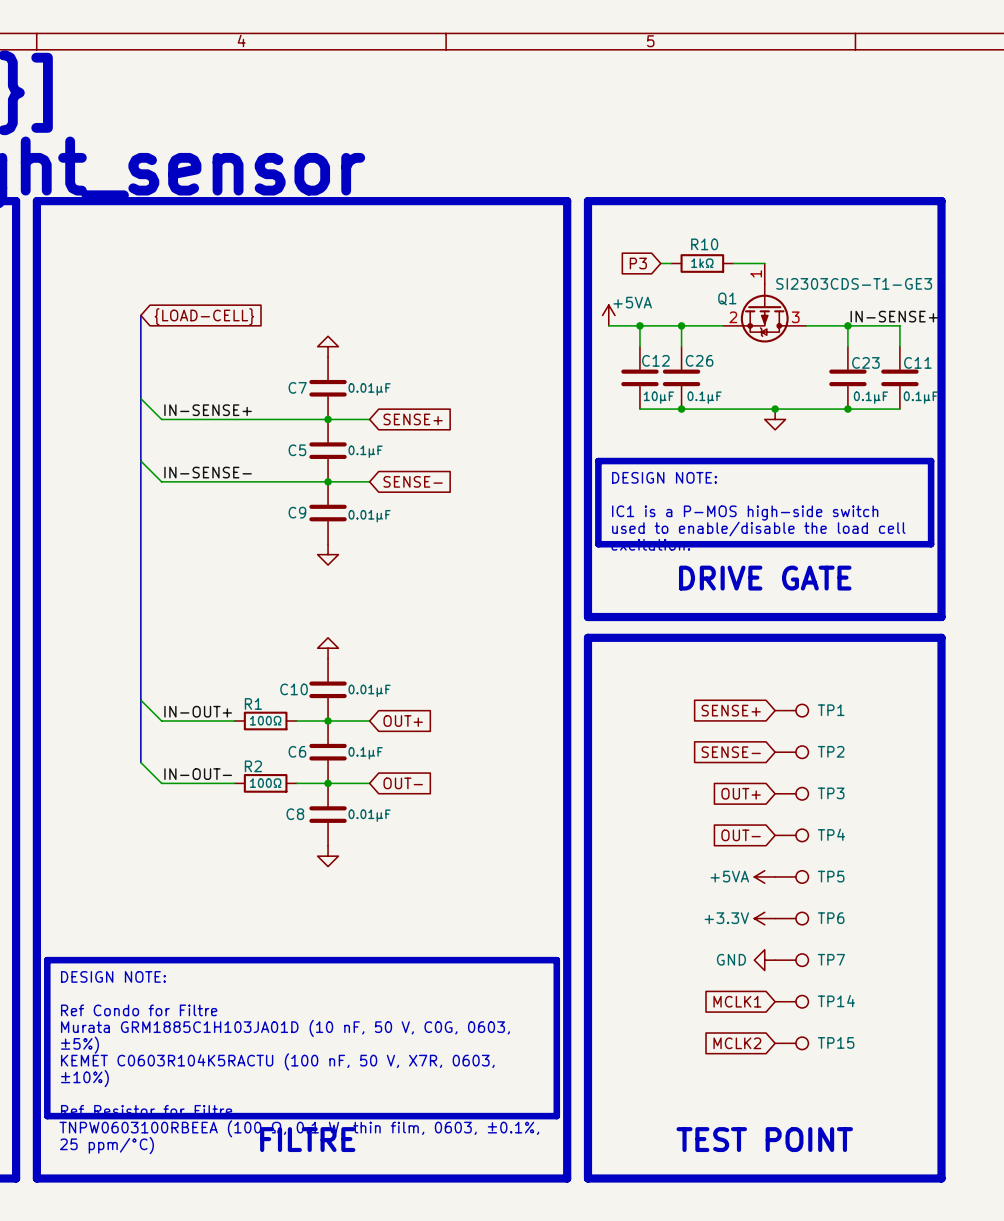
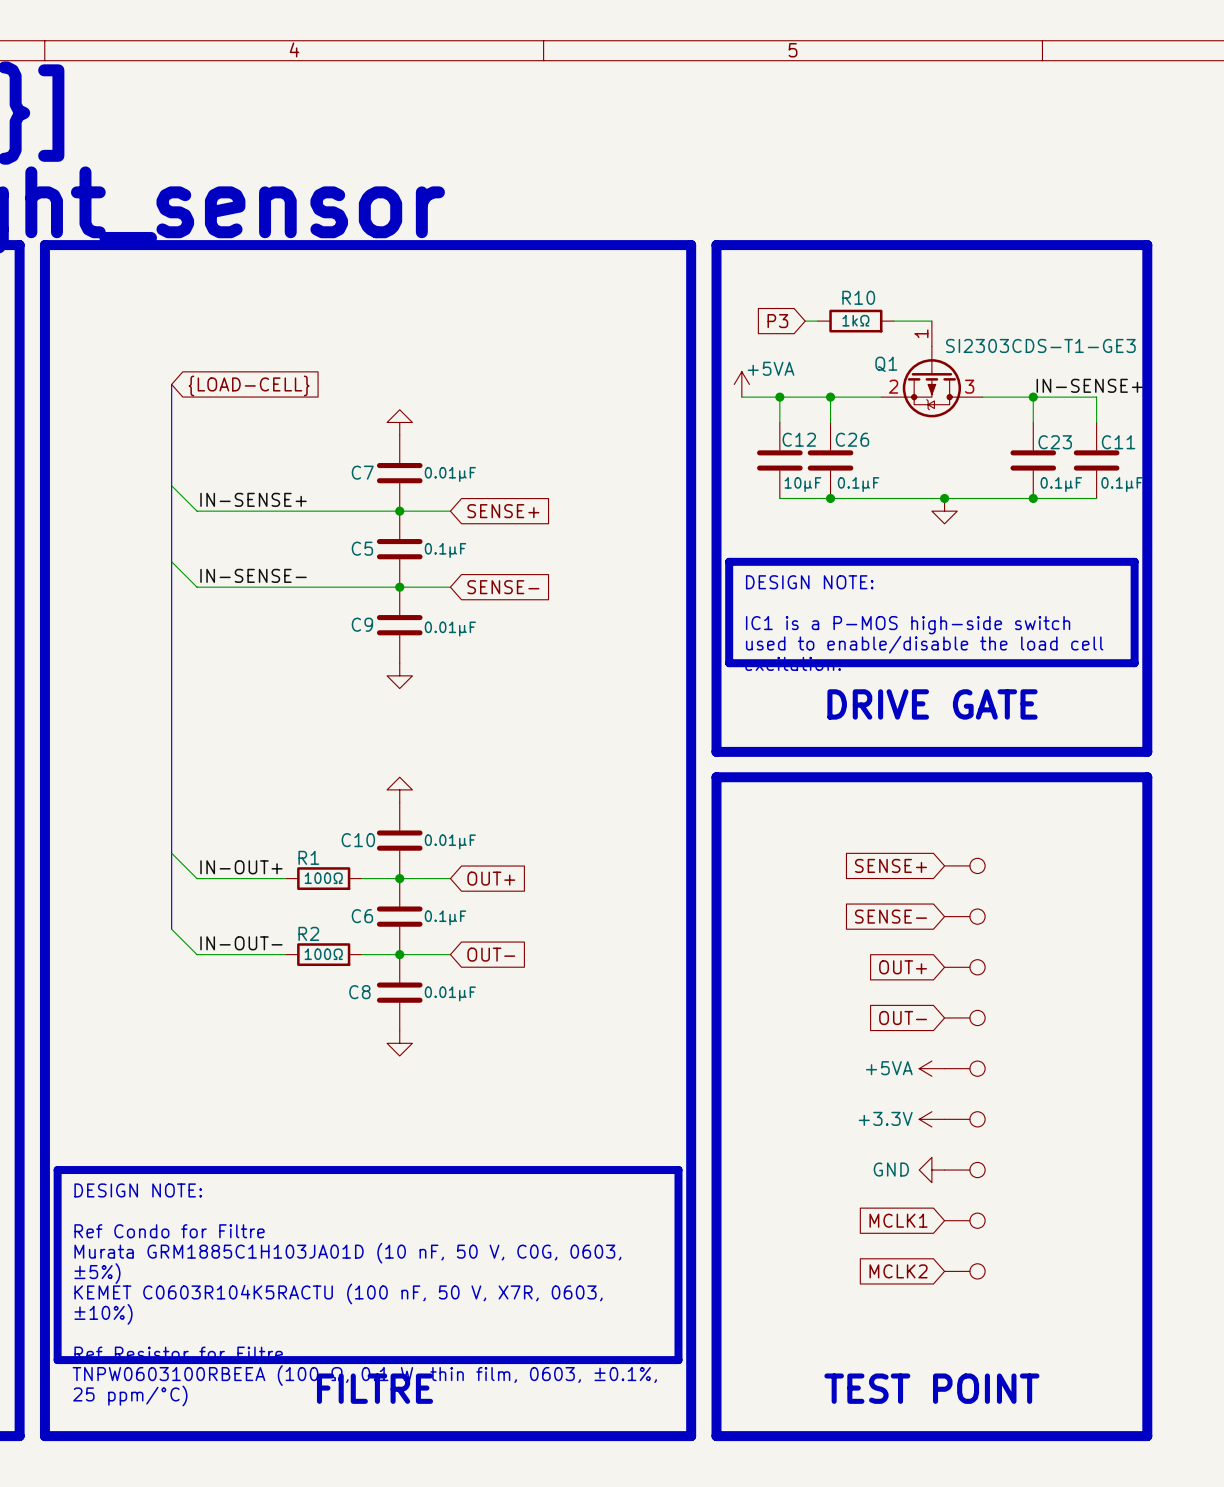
TP1 name: TP1 (831, 710) -> none
TP2 name: TP2 (831, 751) -> none
TP3 name: TP3 (831, 793) -> none
TP4 name: TP4 (831, 834) -> none
TP5 name: TP5 (831, 876) -> none
TP6 name: TP6 (831, 918) -> none
TP7 name: TP7 (831, 959) -> none
TP14 name: TP14 (836, 1001) -> none
TP15 name: TP15 (836, 1042) -> none

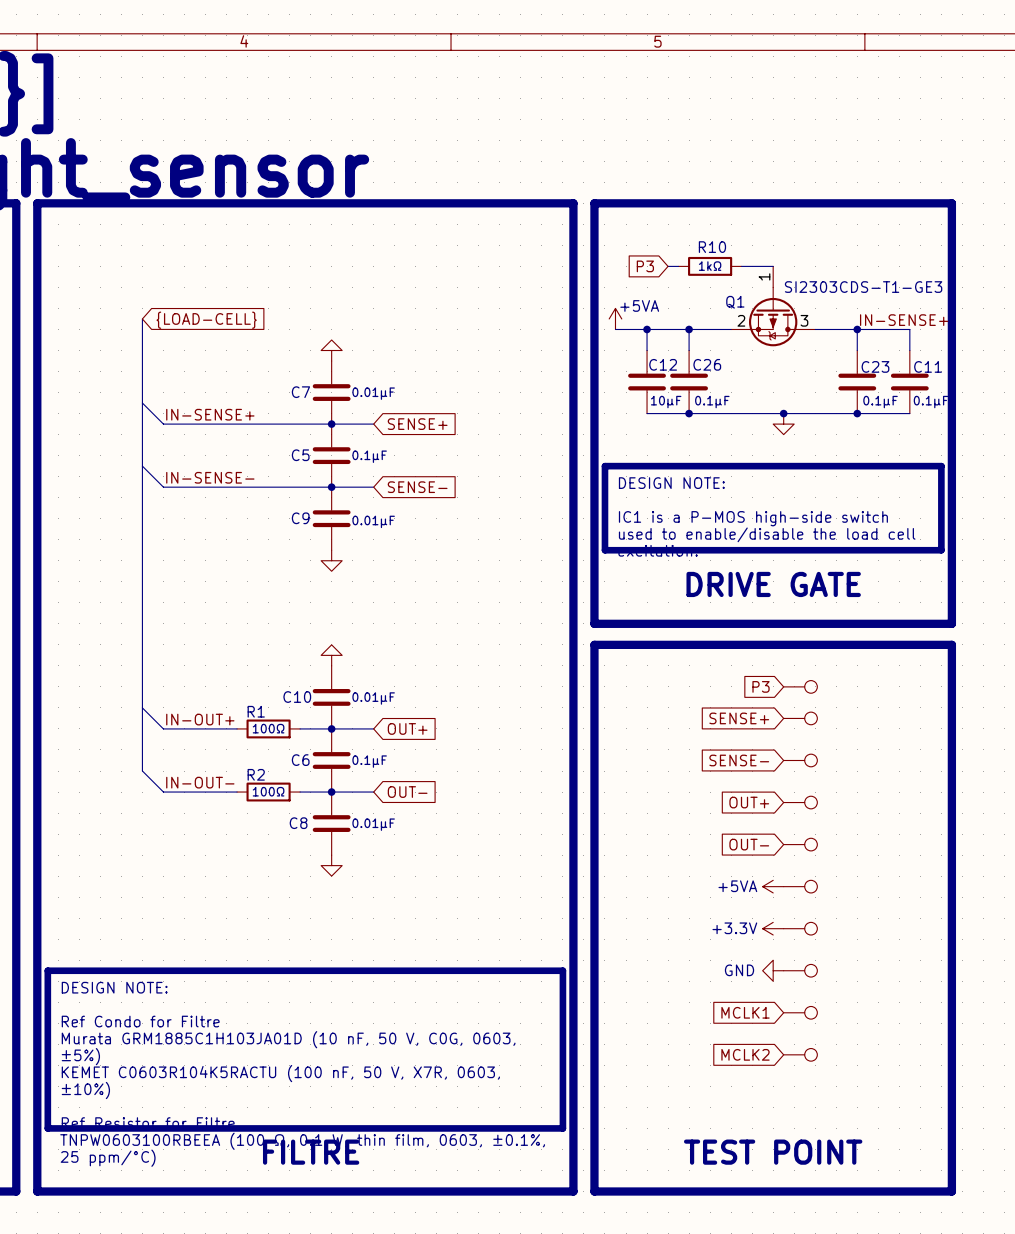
global label: none -> P3 (761, 686)
part: none -> (800, 686)

